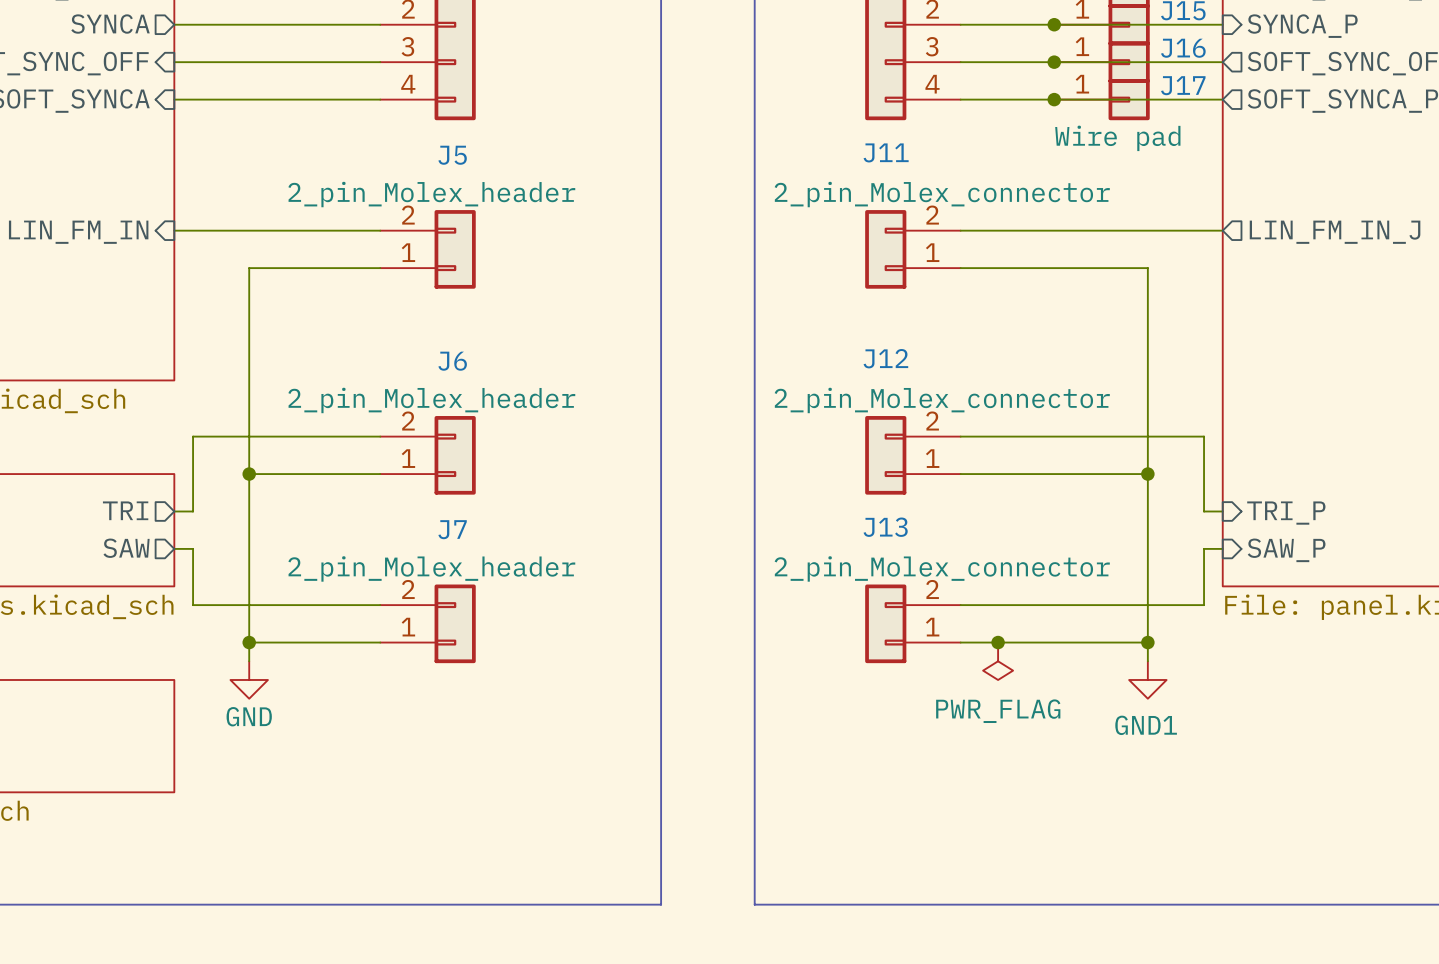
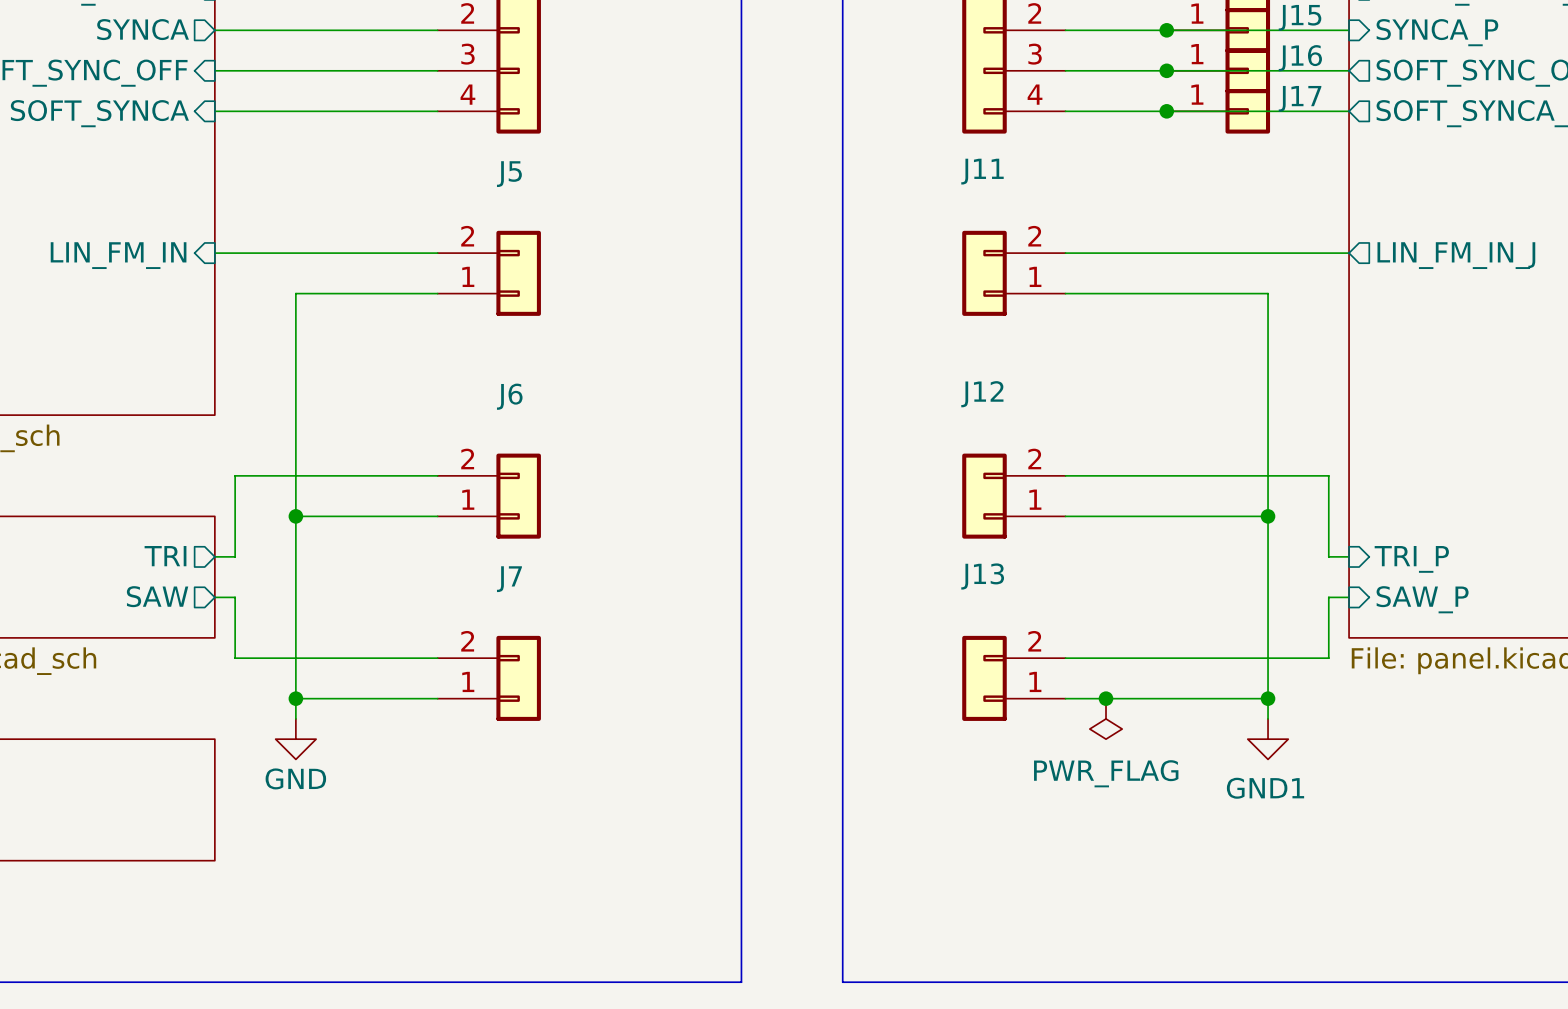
part value: Wire pad (1117, 138) -> none
J5 value: 2_pin_Molex_header (431, 194) -> none
J11 value: 2_pin_Molex_connector (942, 194) -> none
J6 value: 2_pin_Molex_header (431, 400) -> none
J12 value: 2_pin_Molex_connector (942, 400) -> none
J7 value: 2_pin_Molex_header (431, 568) -> none
J13 value: 2_pin_Molex_connector (942, 568) -> none

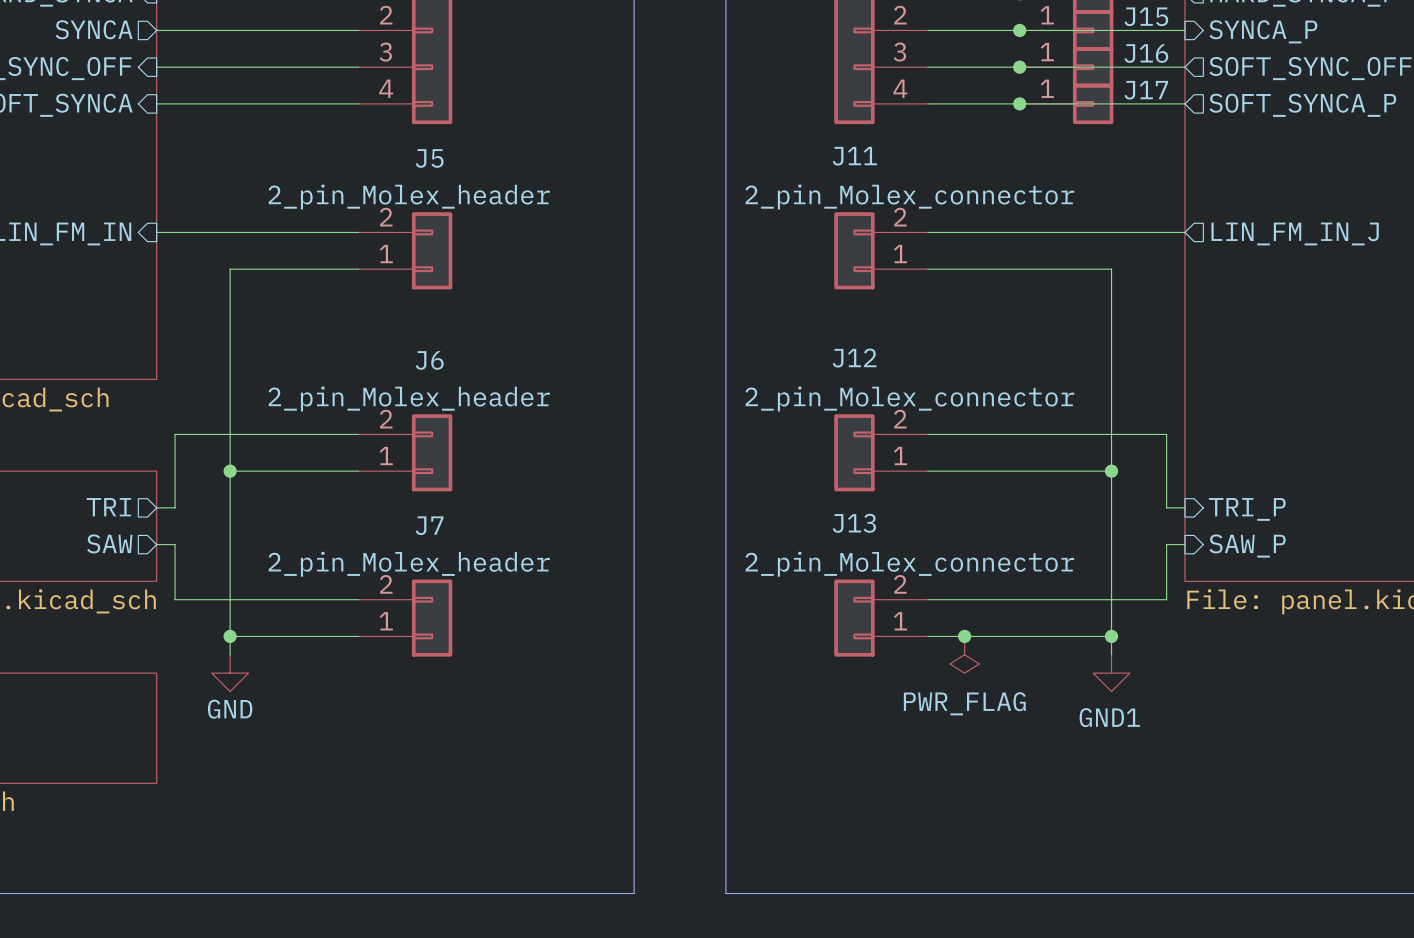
J5 value: none -> 2_pin_Molex_header (409, 197)
J11 value: none -> 2_pin_Molex_connector (909, 197)
J6 value: none -> 2_pin_Molex_header (409, 398)
J12 value: none -> 2_pin_Molex_connector (909, 398)
J7 value: none -> 2_pin_Molex_header (409, 564)
J13 value: none -> 2_pin_Molex_connector (909, 564)

